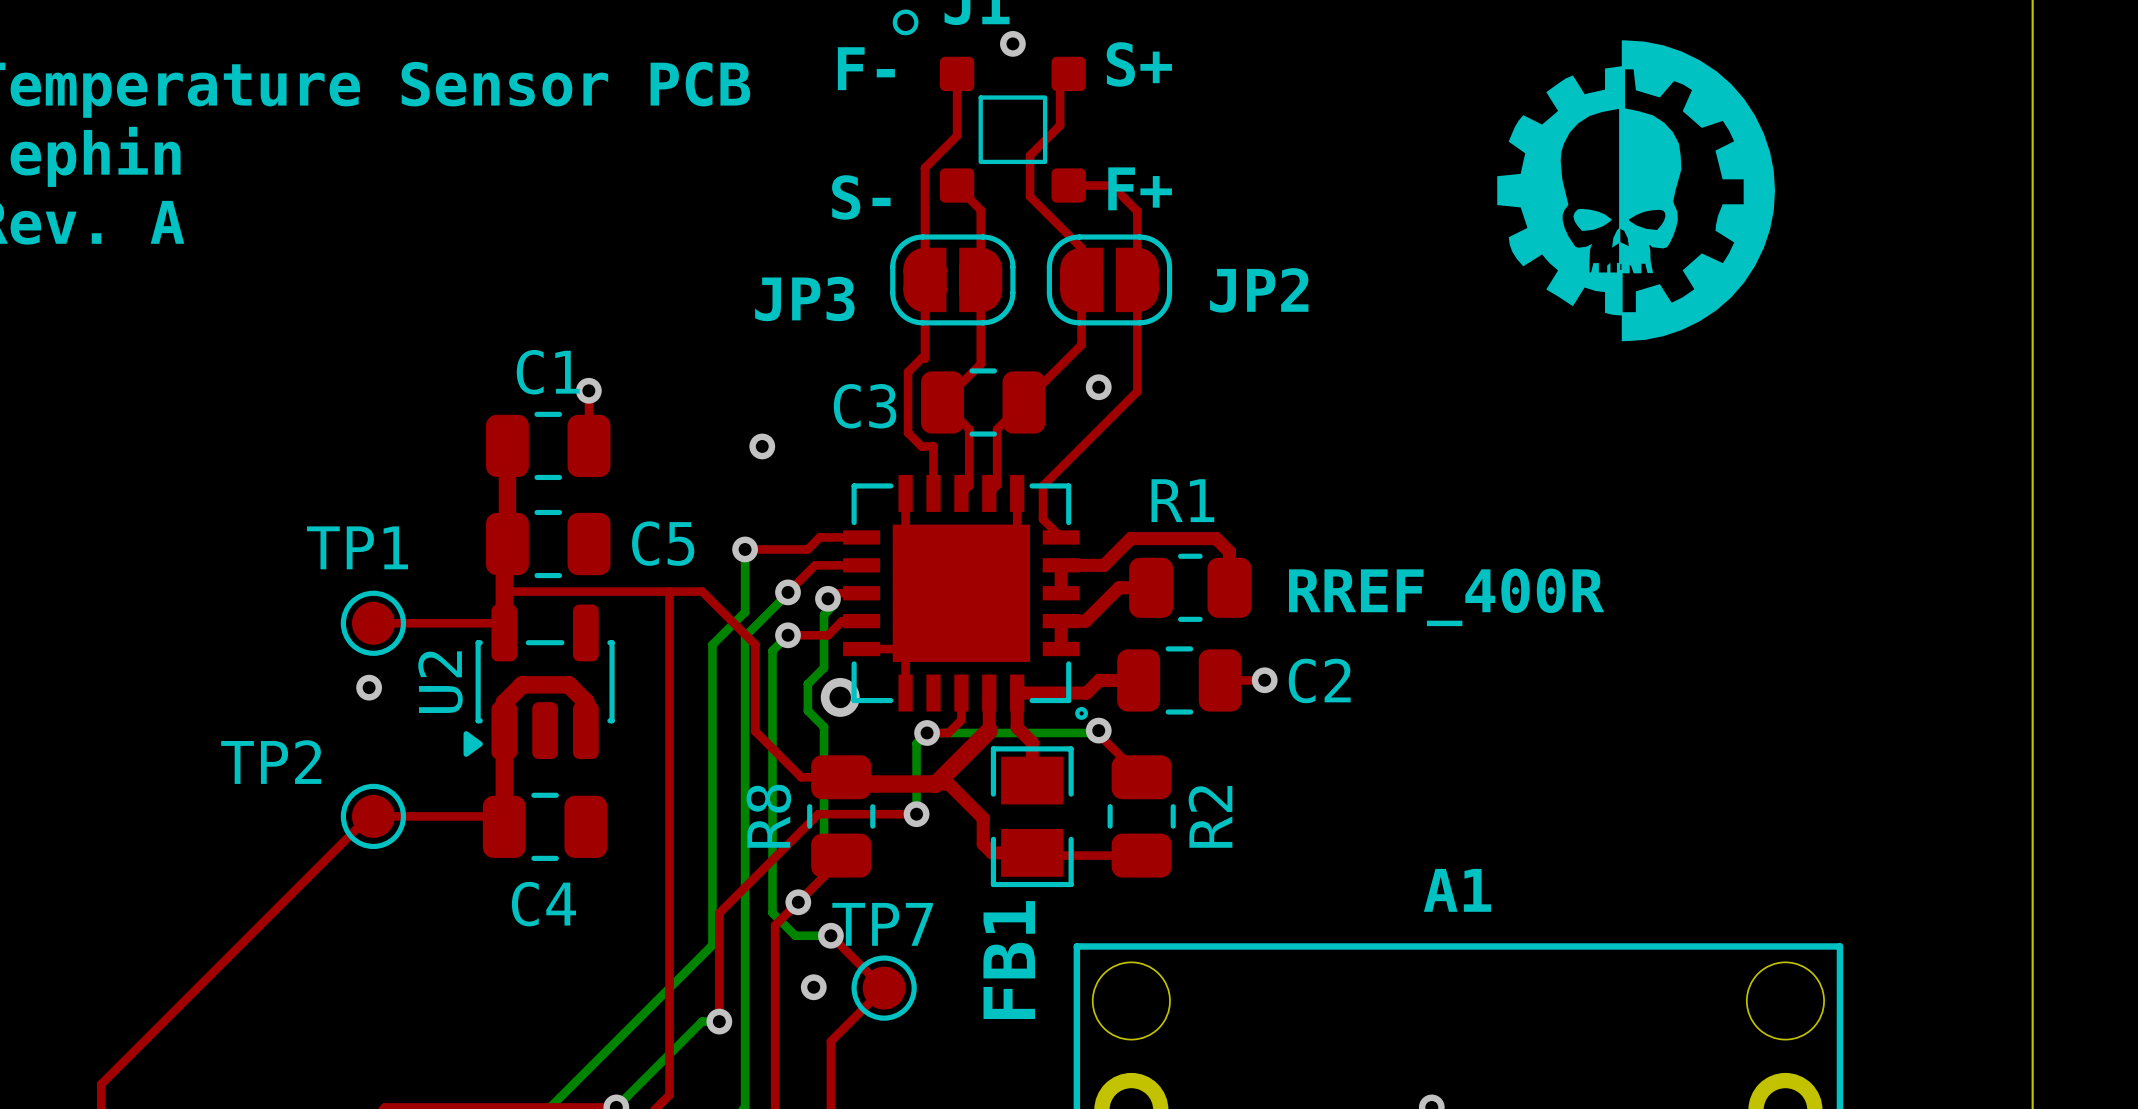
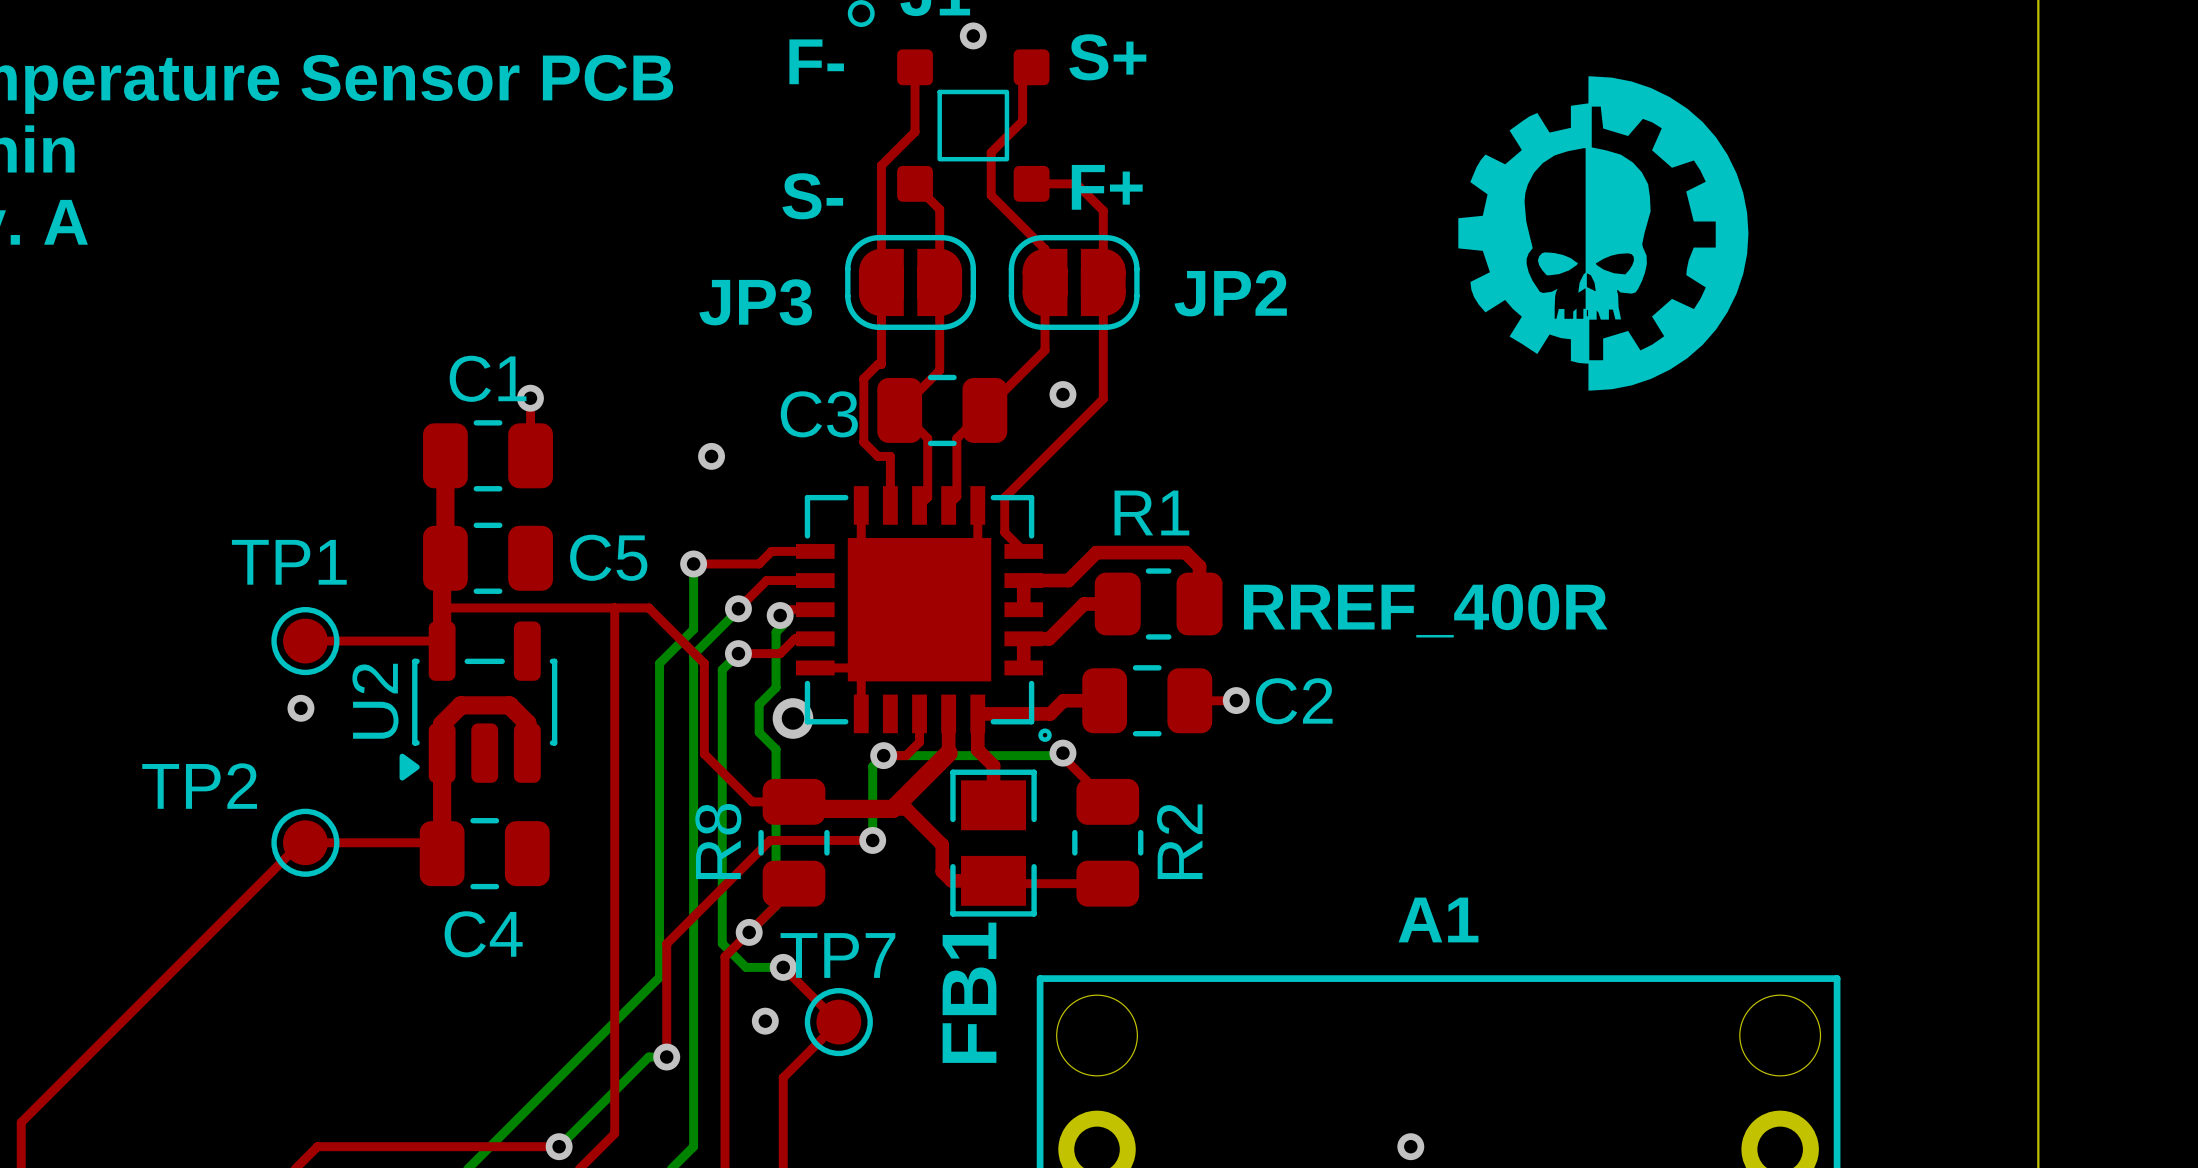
drawing position: (1636, 190) -> (1603, 233)
drawing position: (1592, 219) -> (1557, 263)

